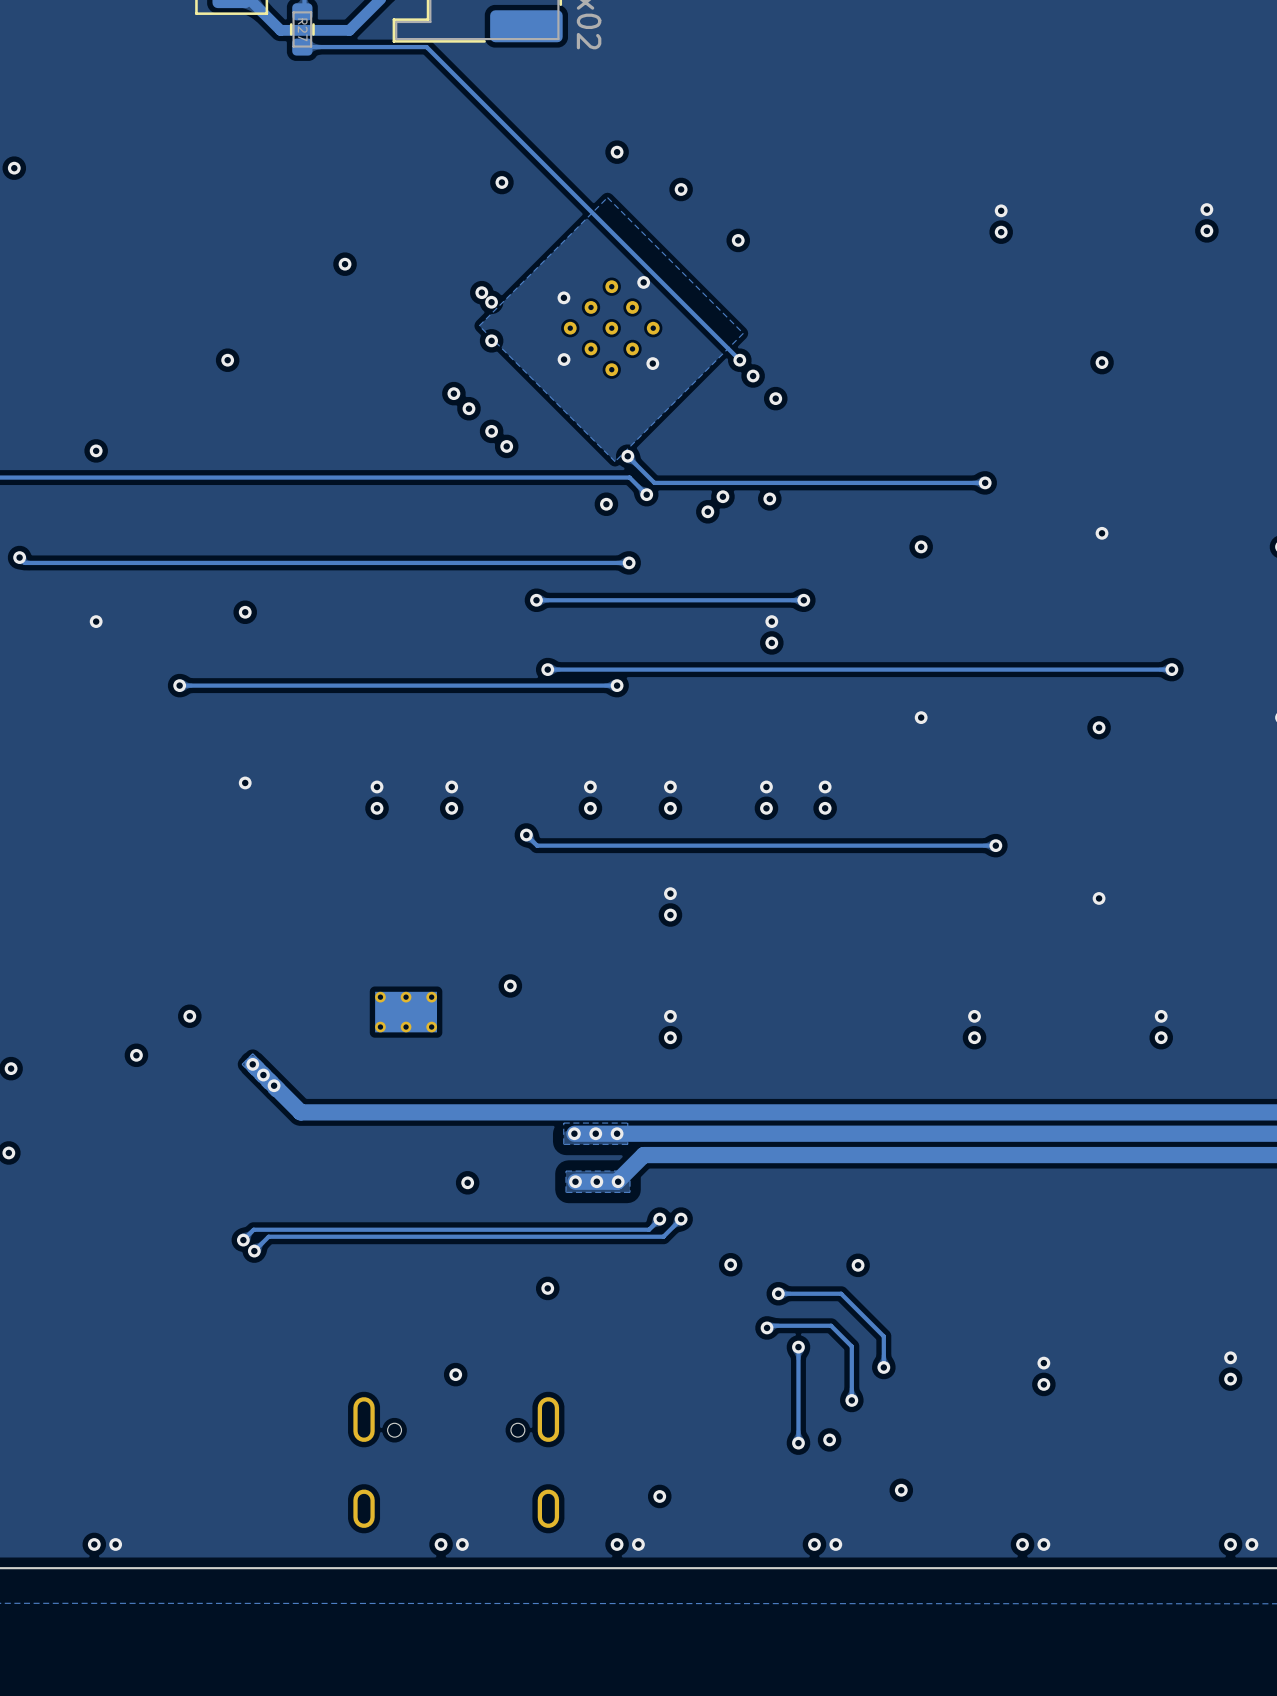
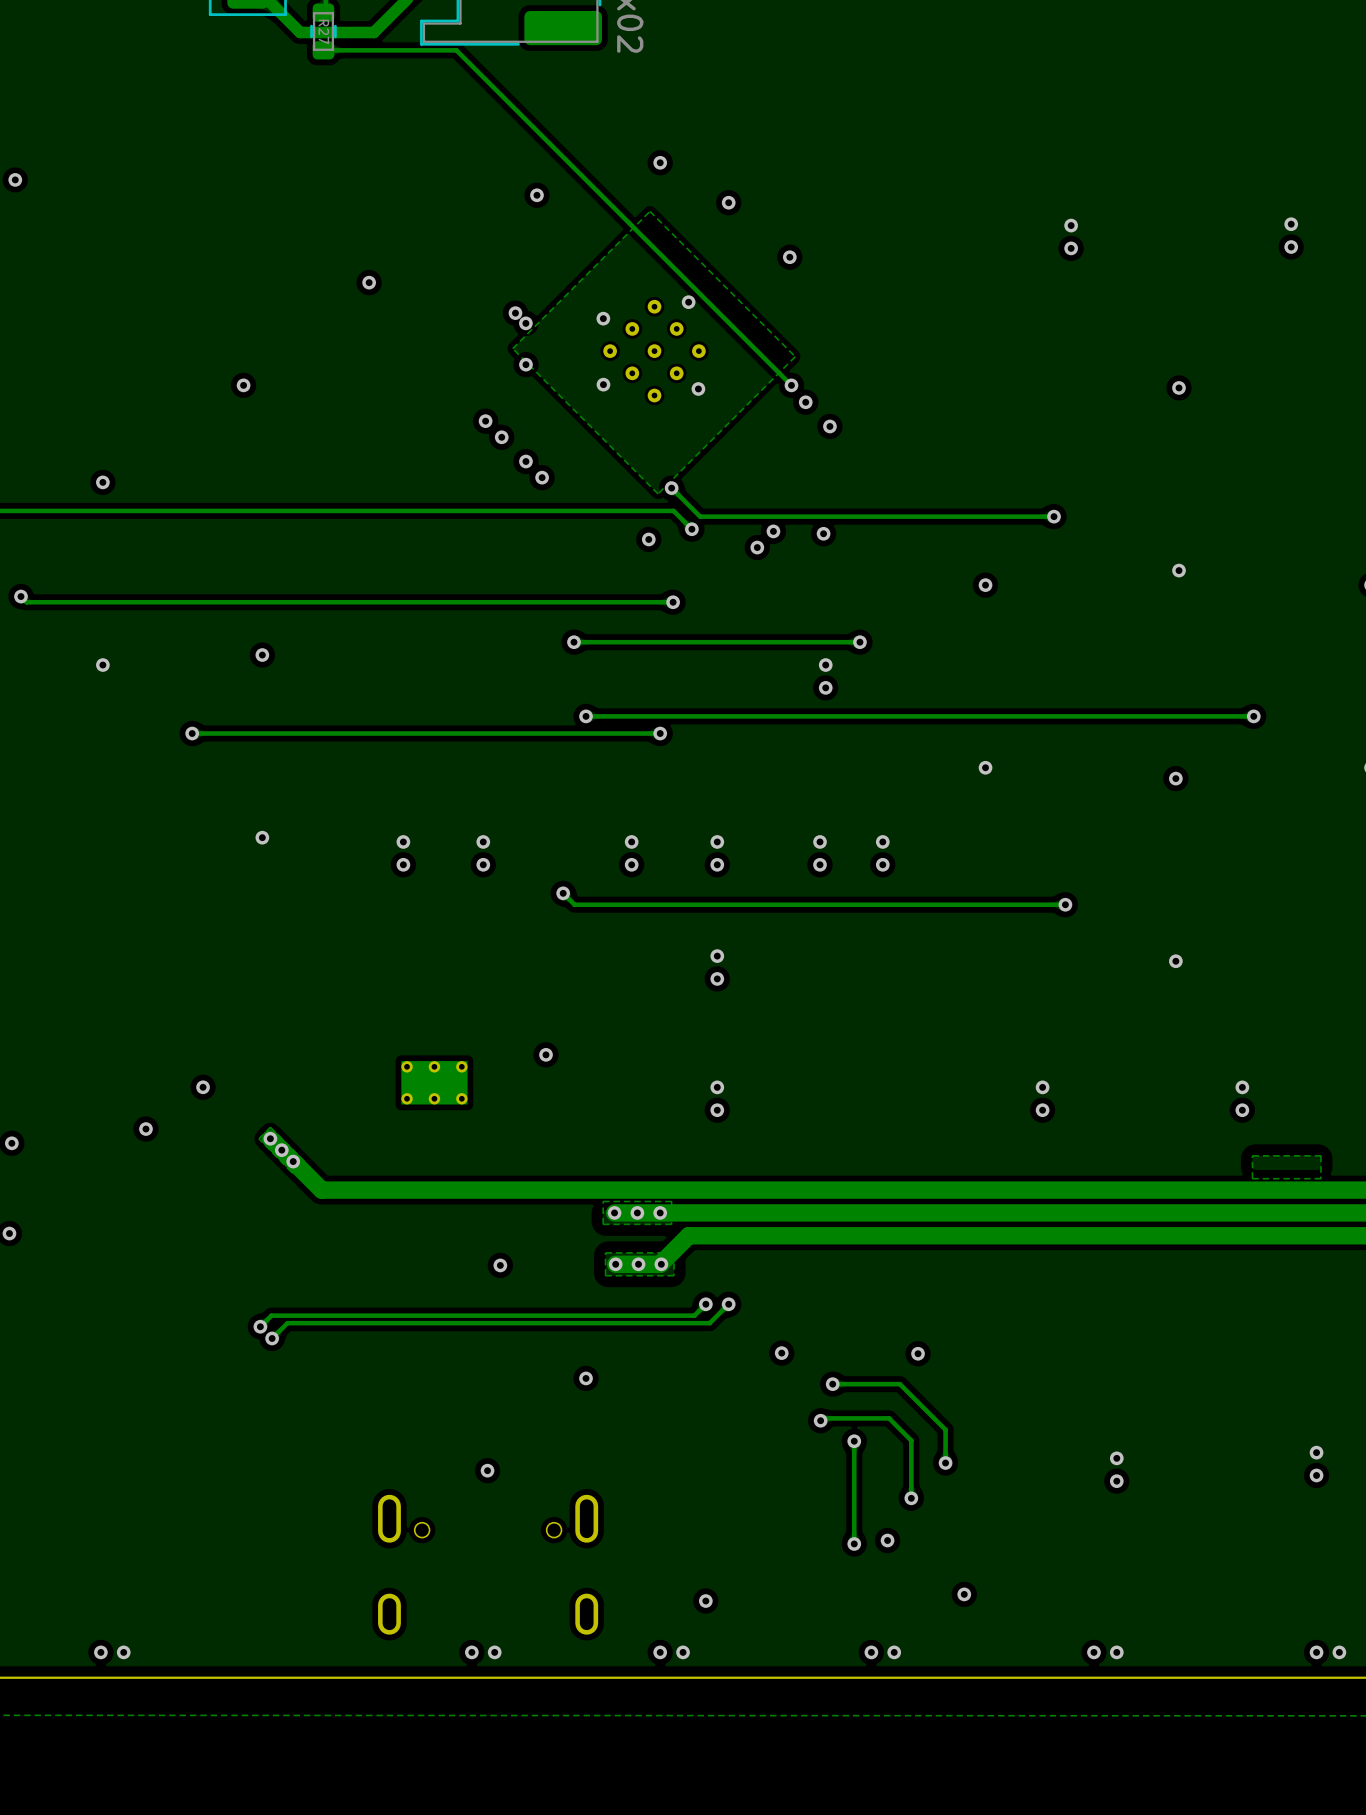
zone outline: none -> (1320, 1155) (1320, 1178) (1252, 1178) (1252, 1155) (1320, 1155)

